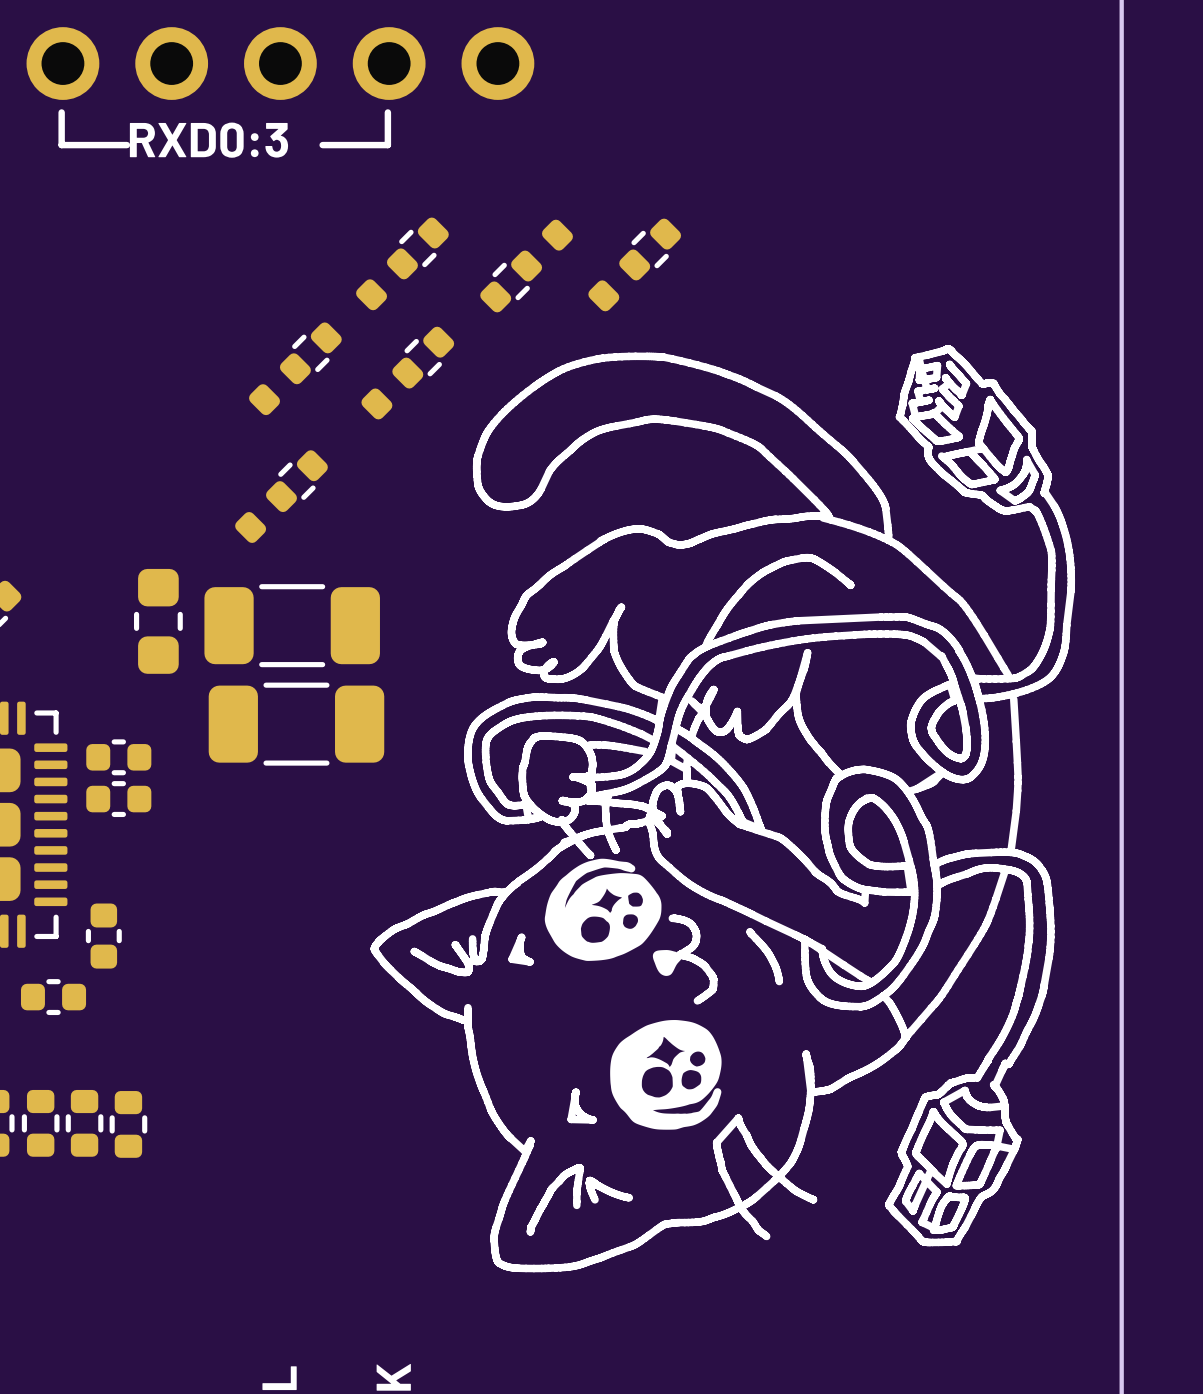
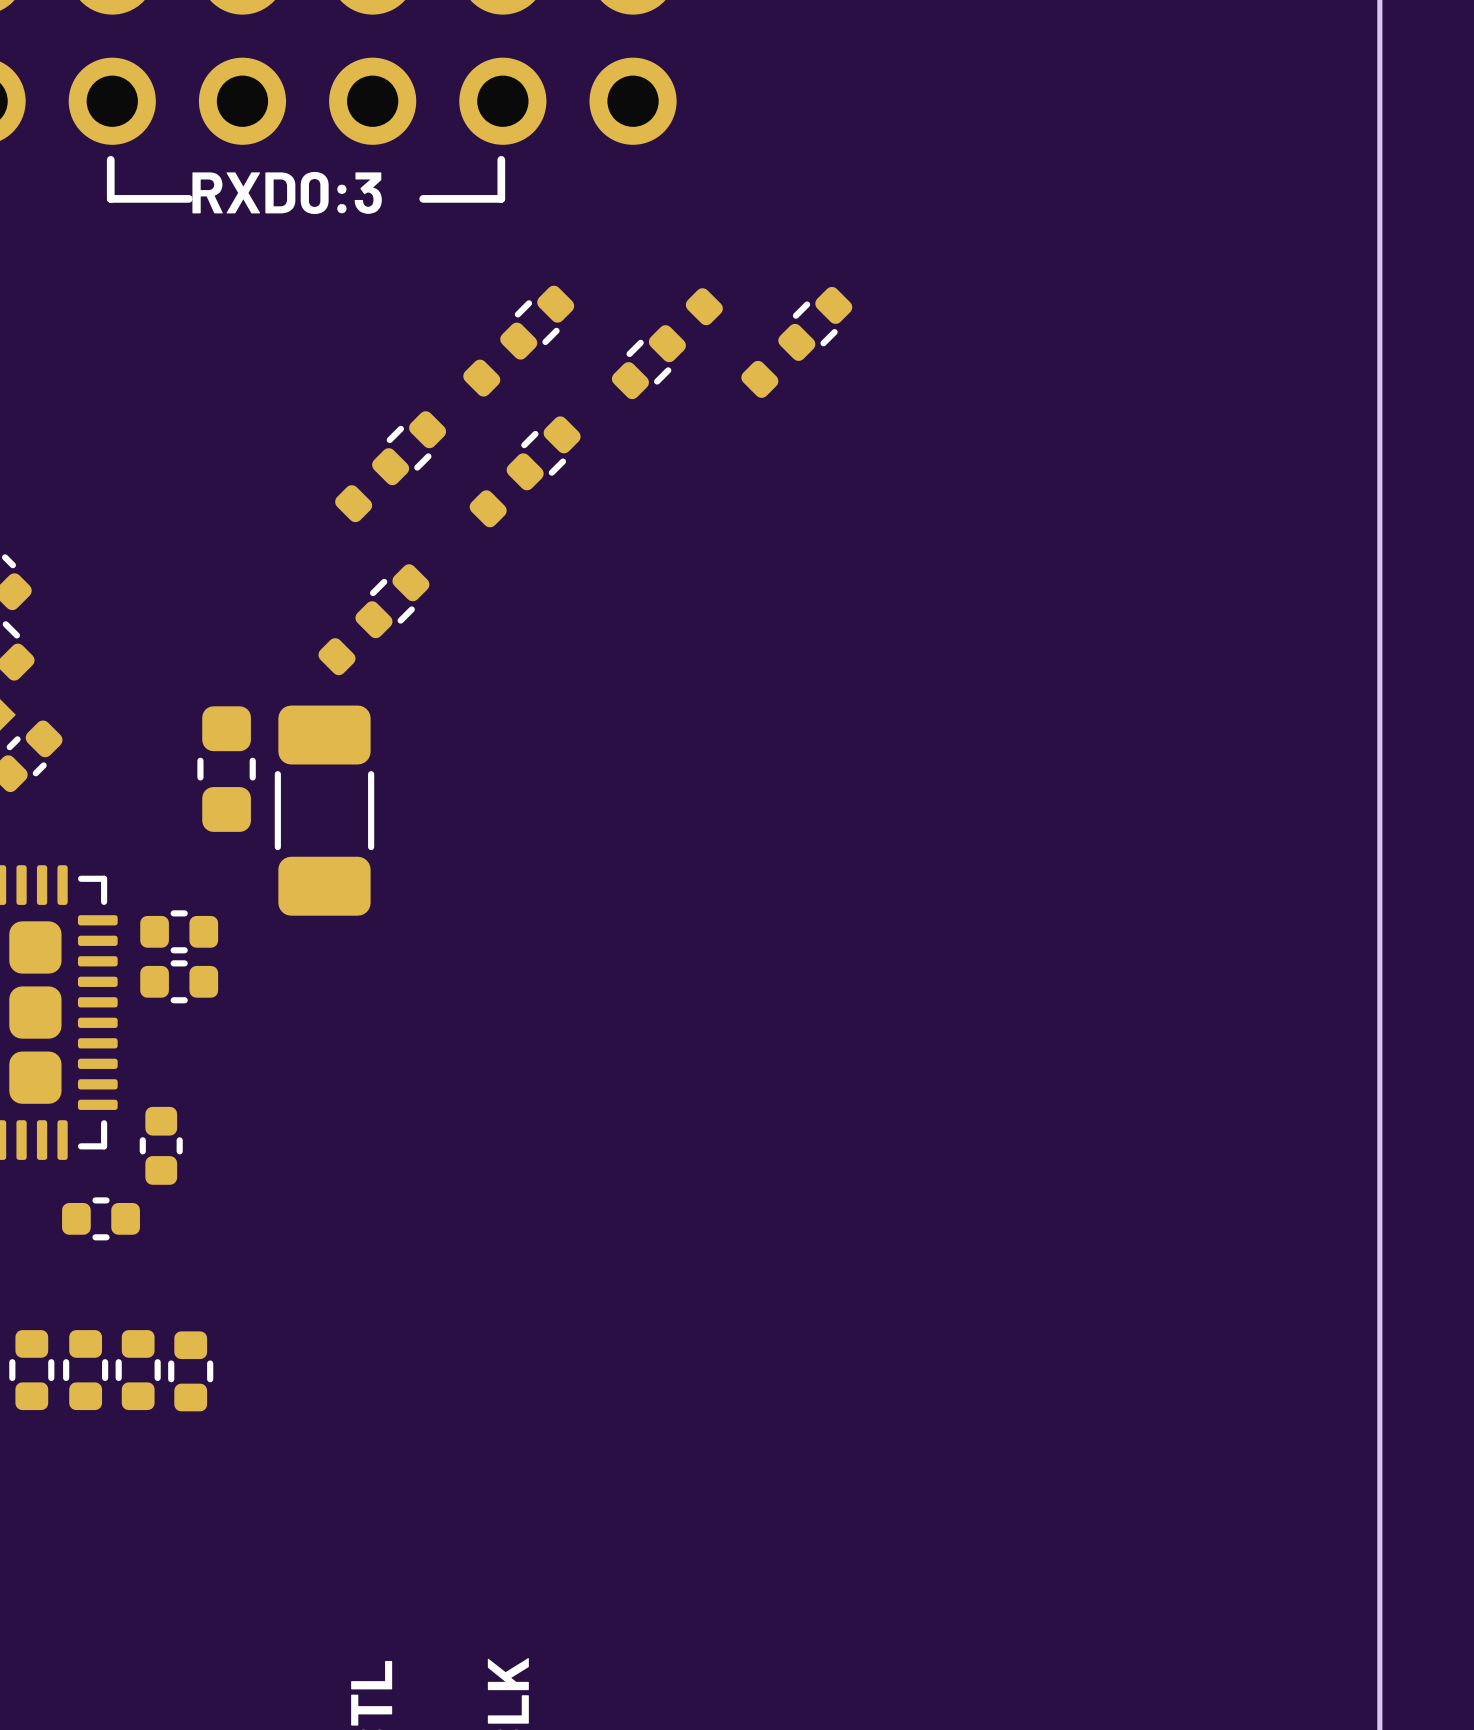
drawing: [370, 345, 1076, 1273] -> none
part: (292, 625) -> none
part: none -> (324, 810)
part: (296, 724) -> none

